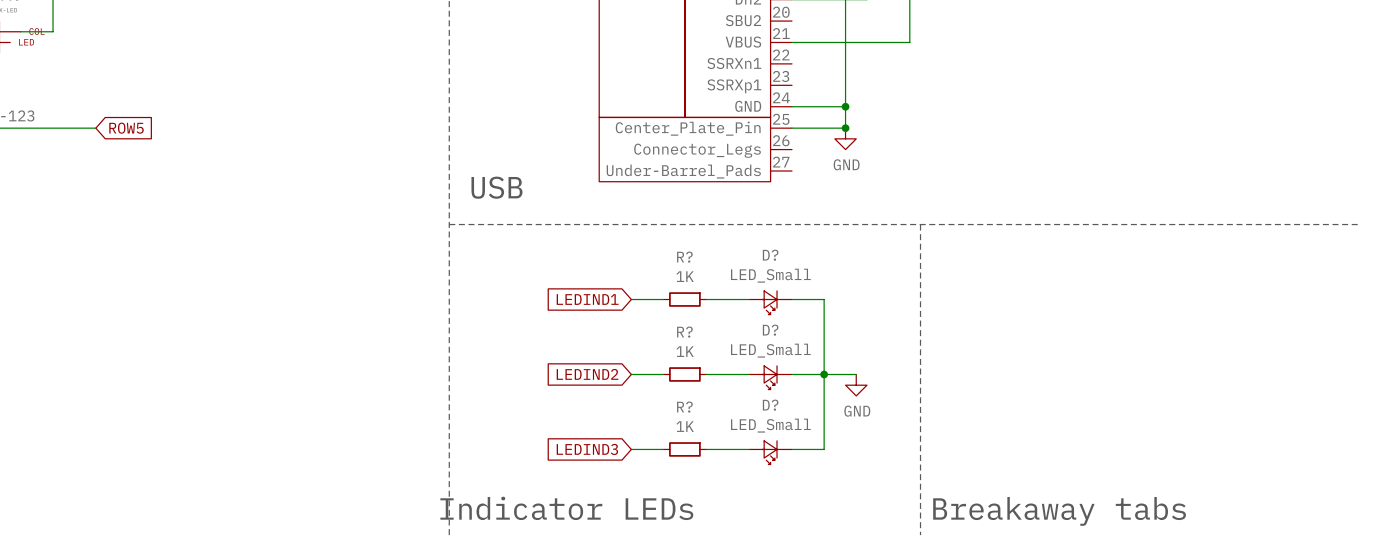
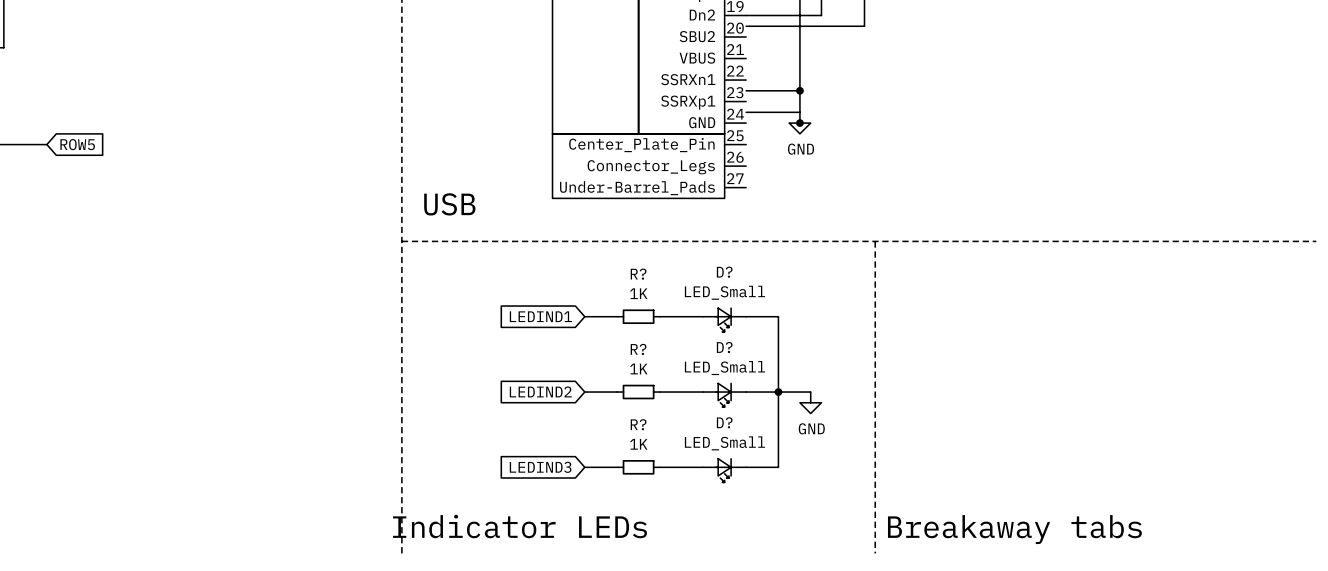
wire: (909, 10) (909, 42) (792, 42) -> (864, 26) (746, 26)
junction: none -> (799, 90)
wire: (845, 96) (845, 128) (792, 128) -> (799, 112) (746, 112)
wire: (792, 106) (845, 106) -> (746, 90) (799, 90)
junction: (845, 128) -> none
power symbol position: GND (845, 138) -> GND (799, 123)

